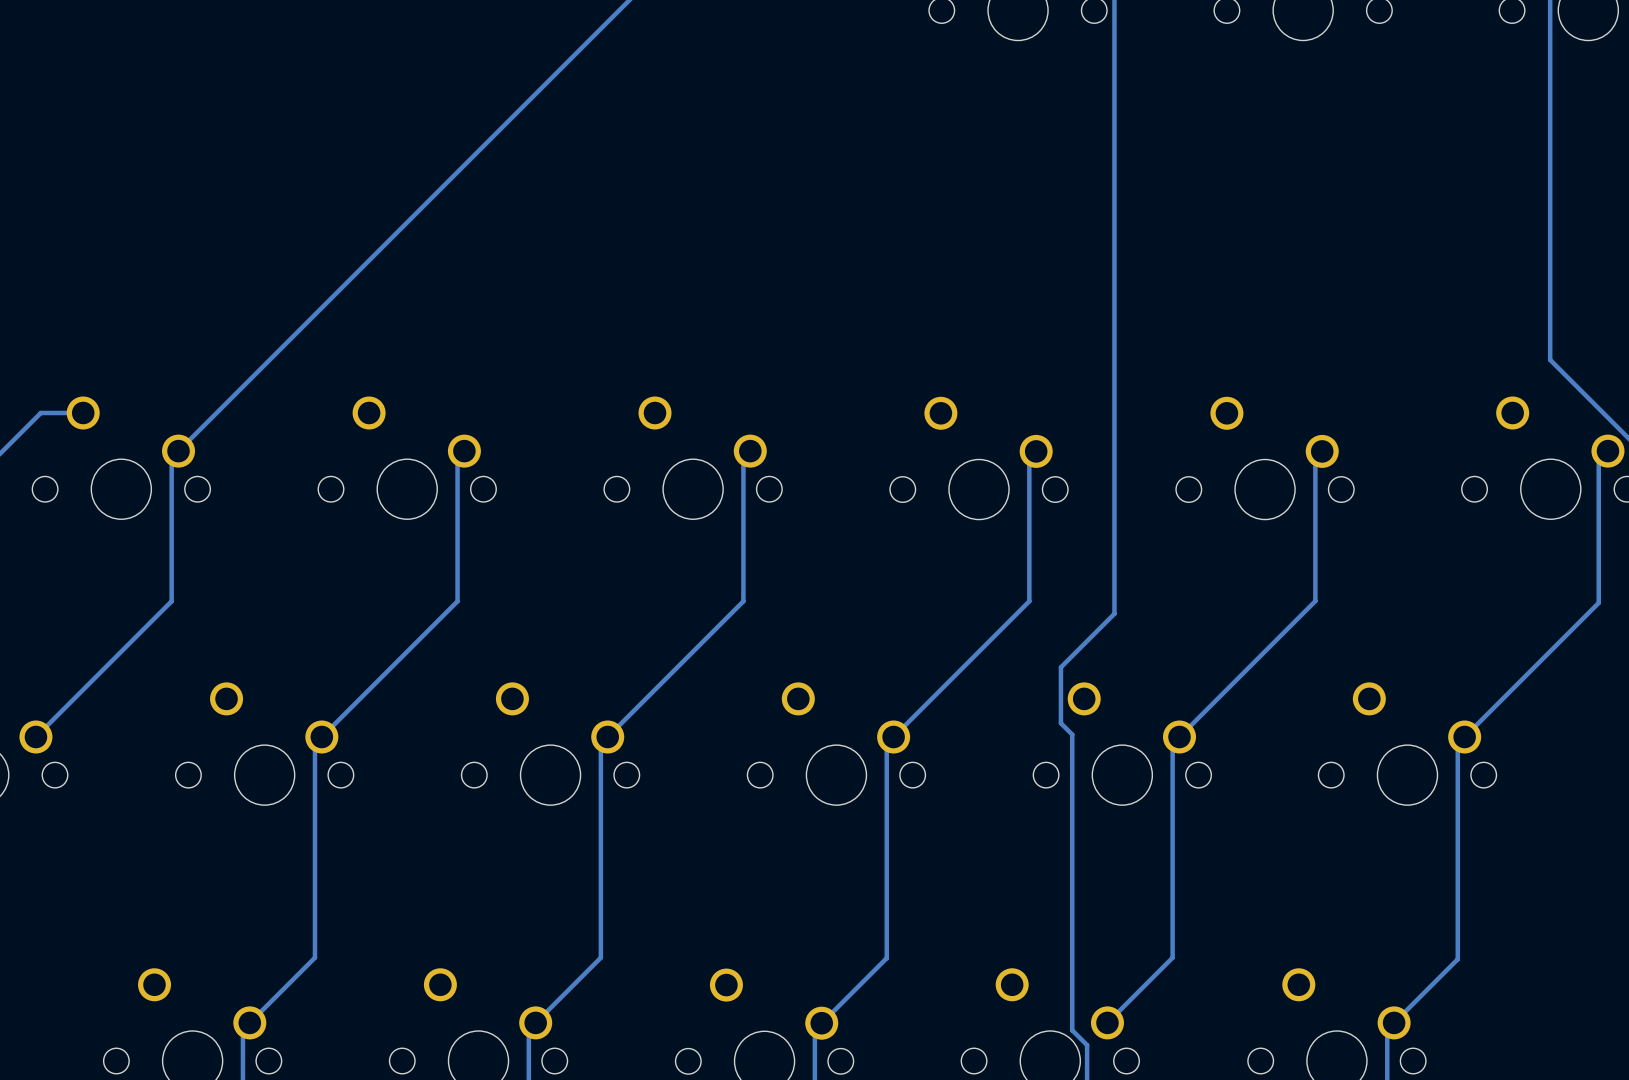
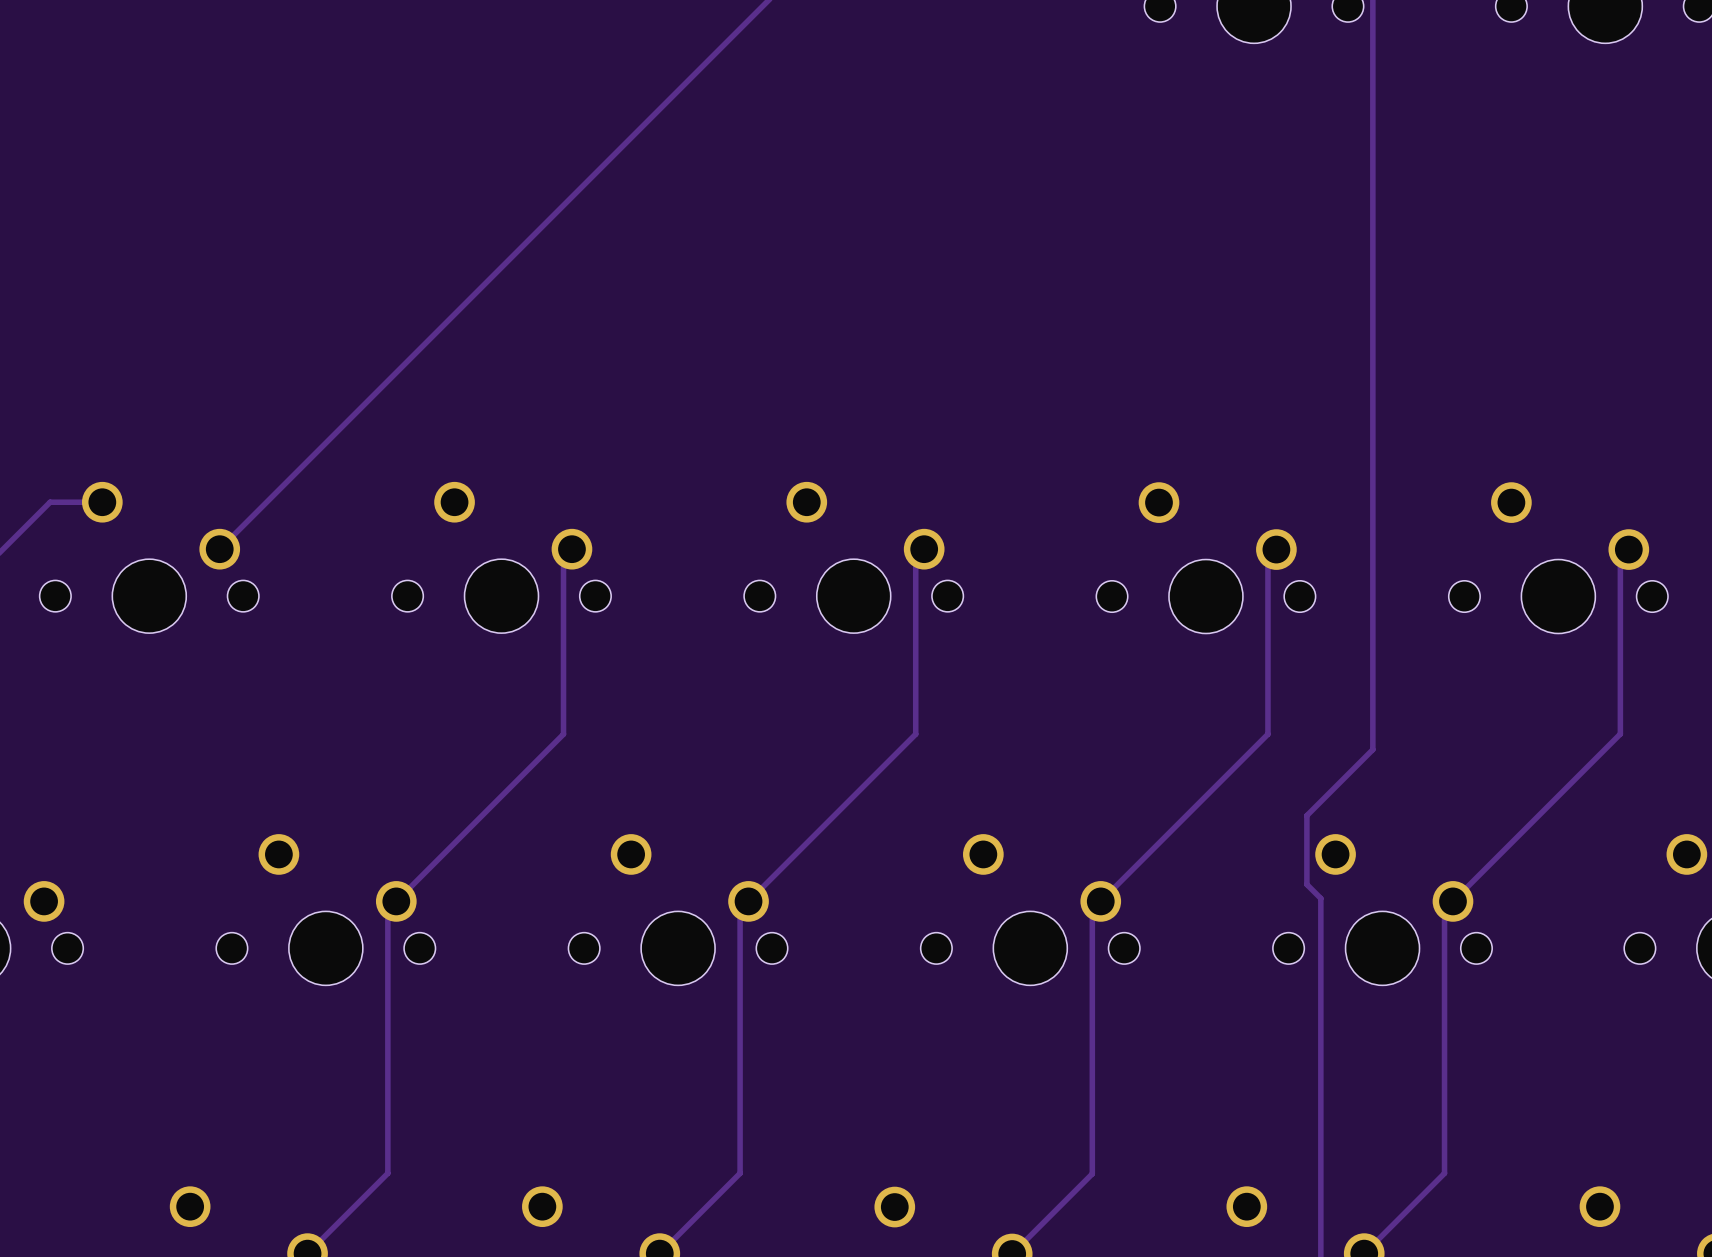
track: (178, 451) (171, 457) (171, 601) (35, 737) -> none

